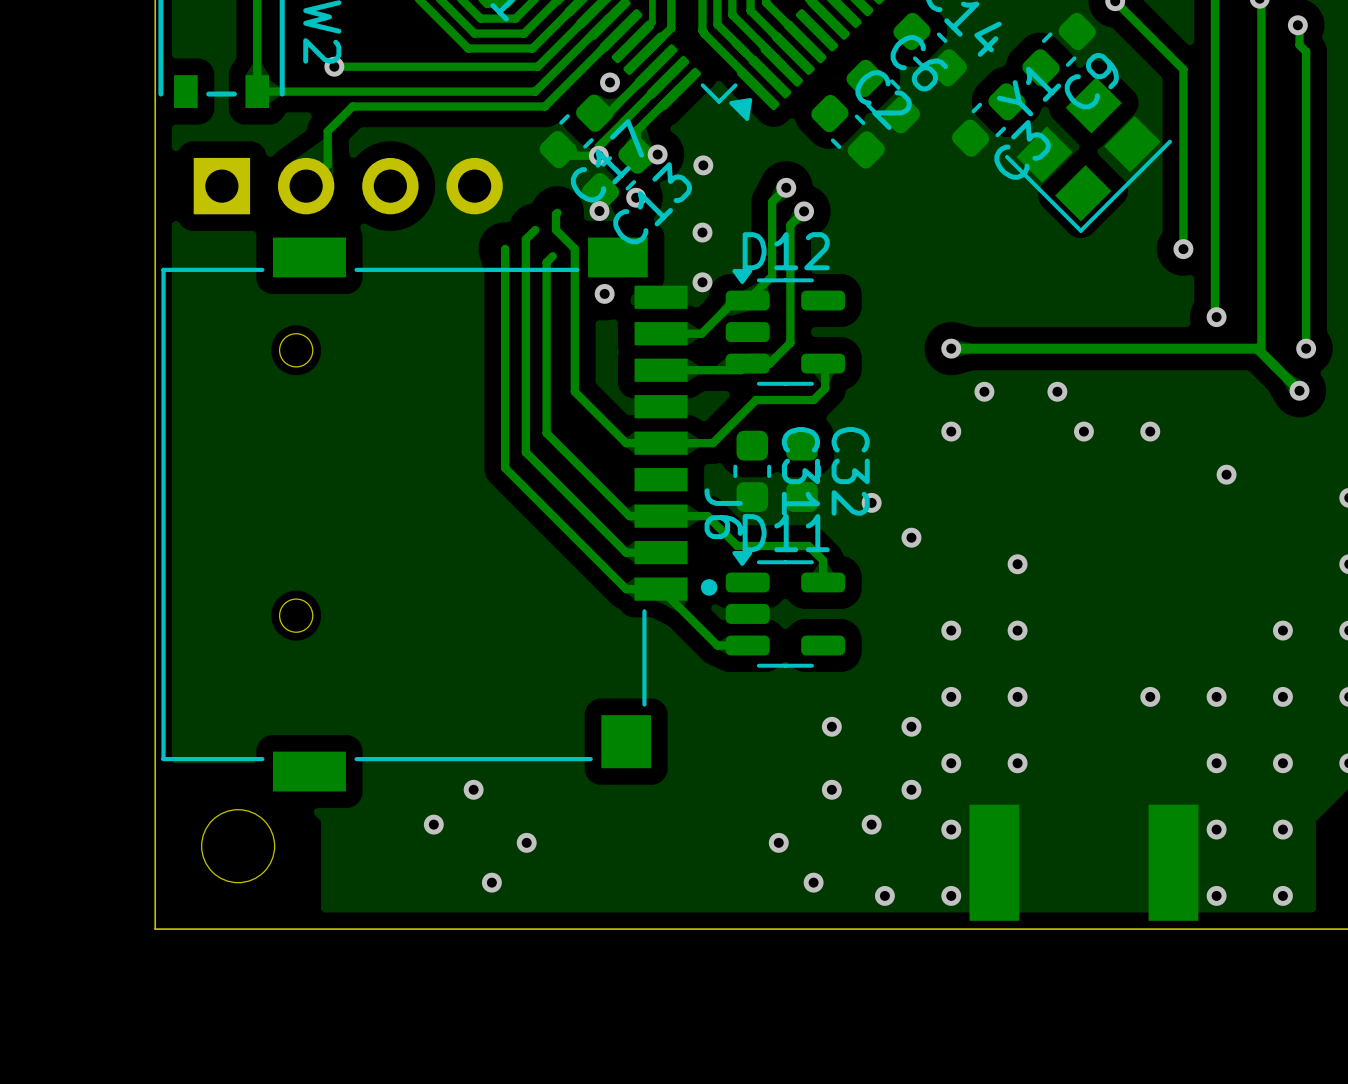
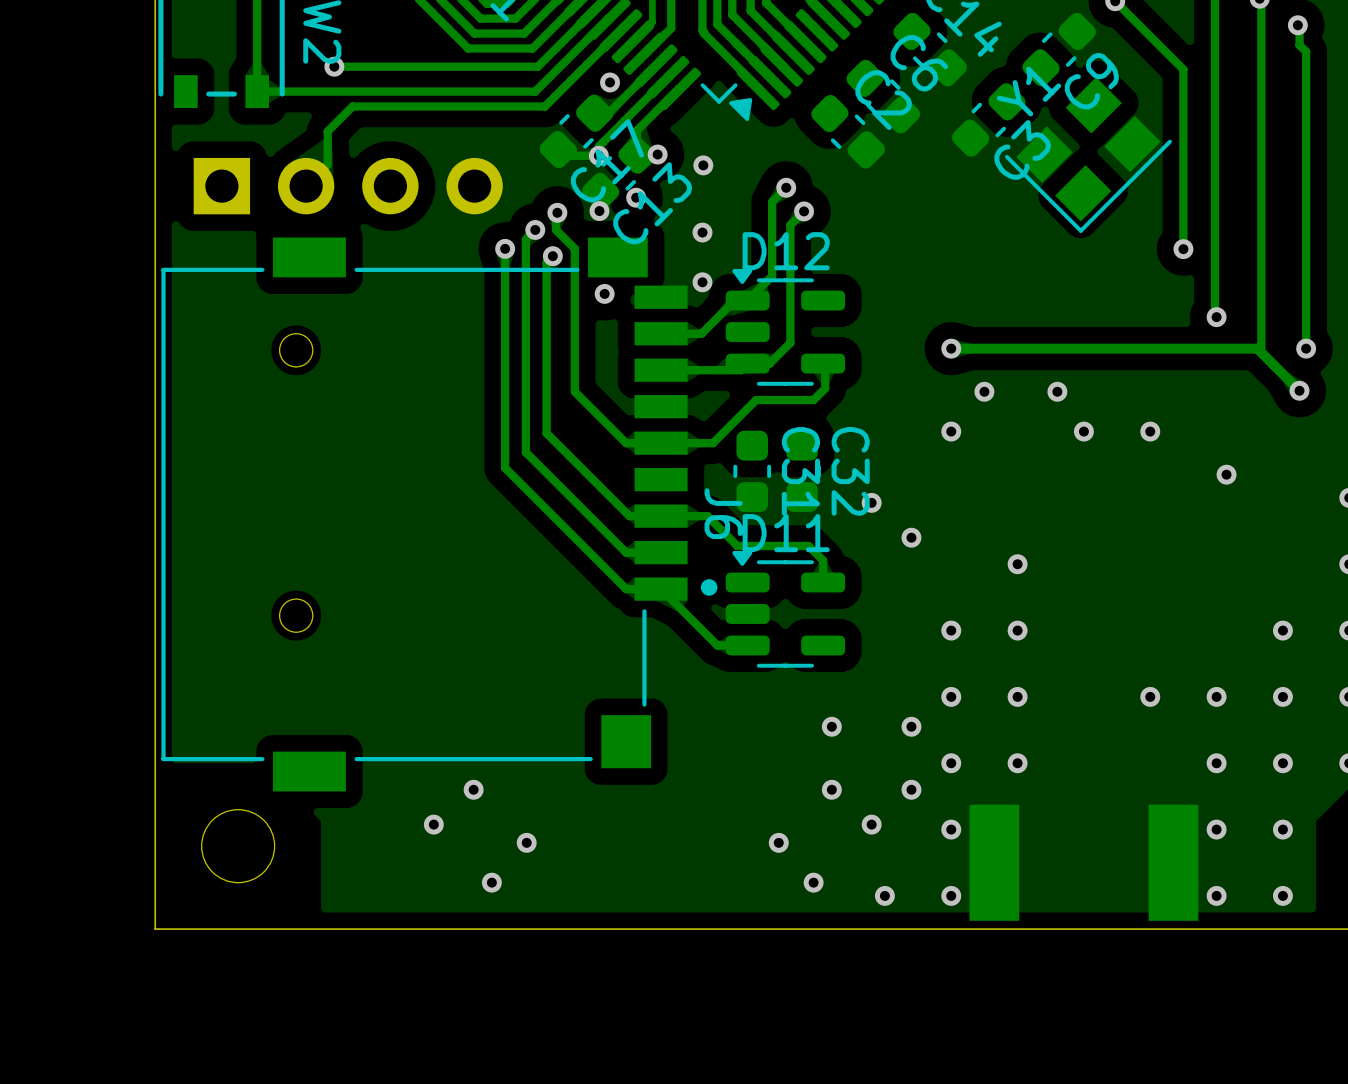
via: none -> (557, 212)
via: none -> (535, 229)
via: none -> (505, 248)
via: none -> (552, 256)

